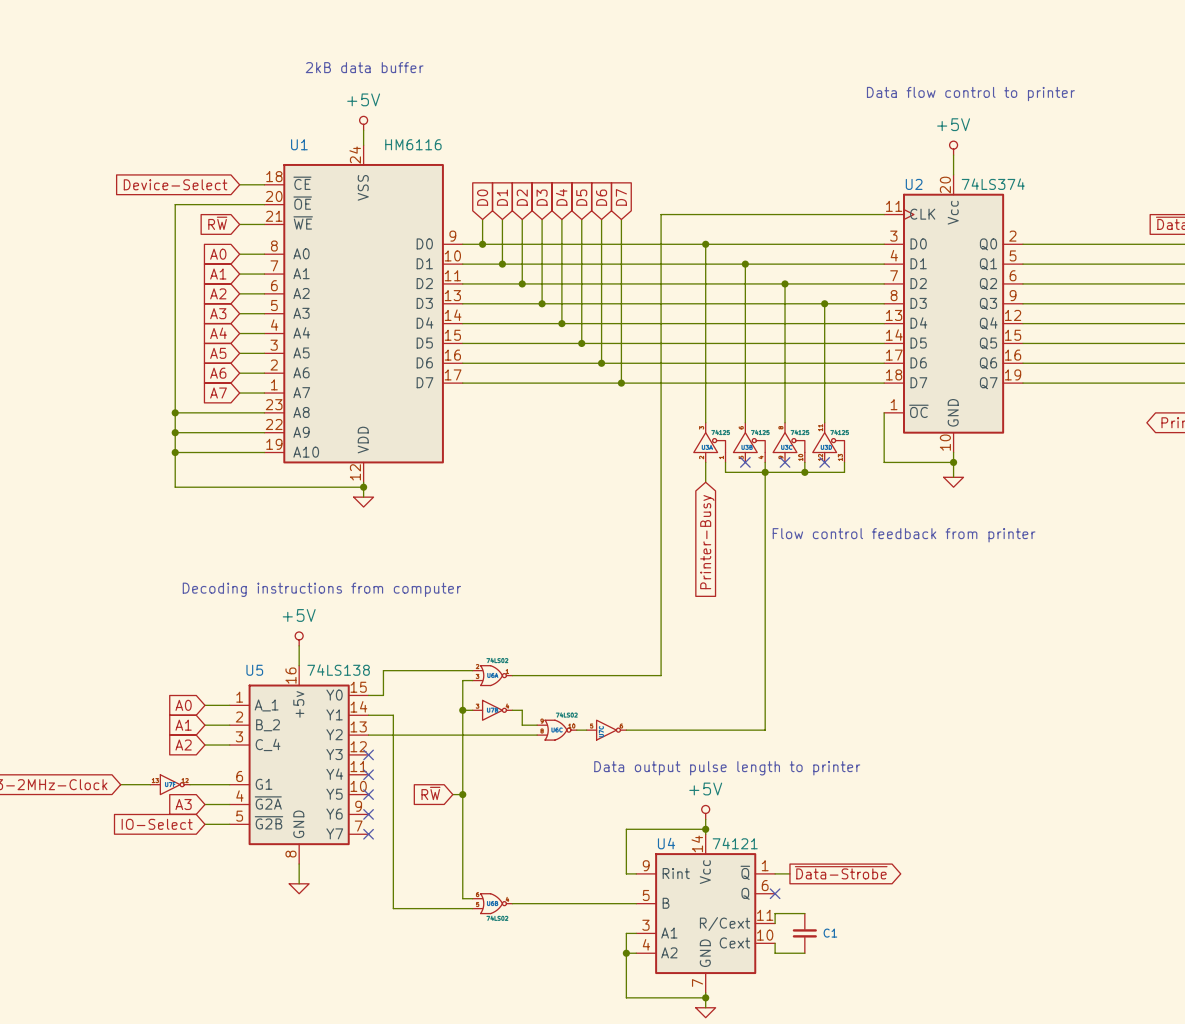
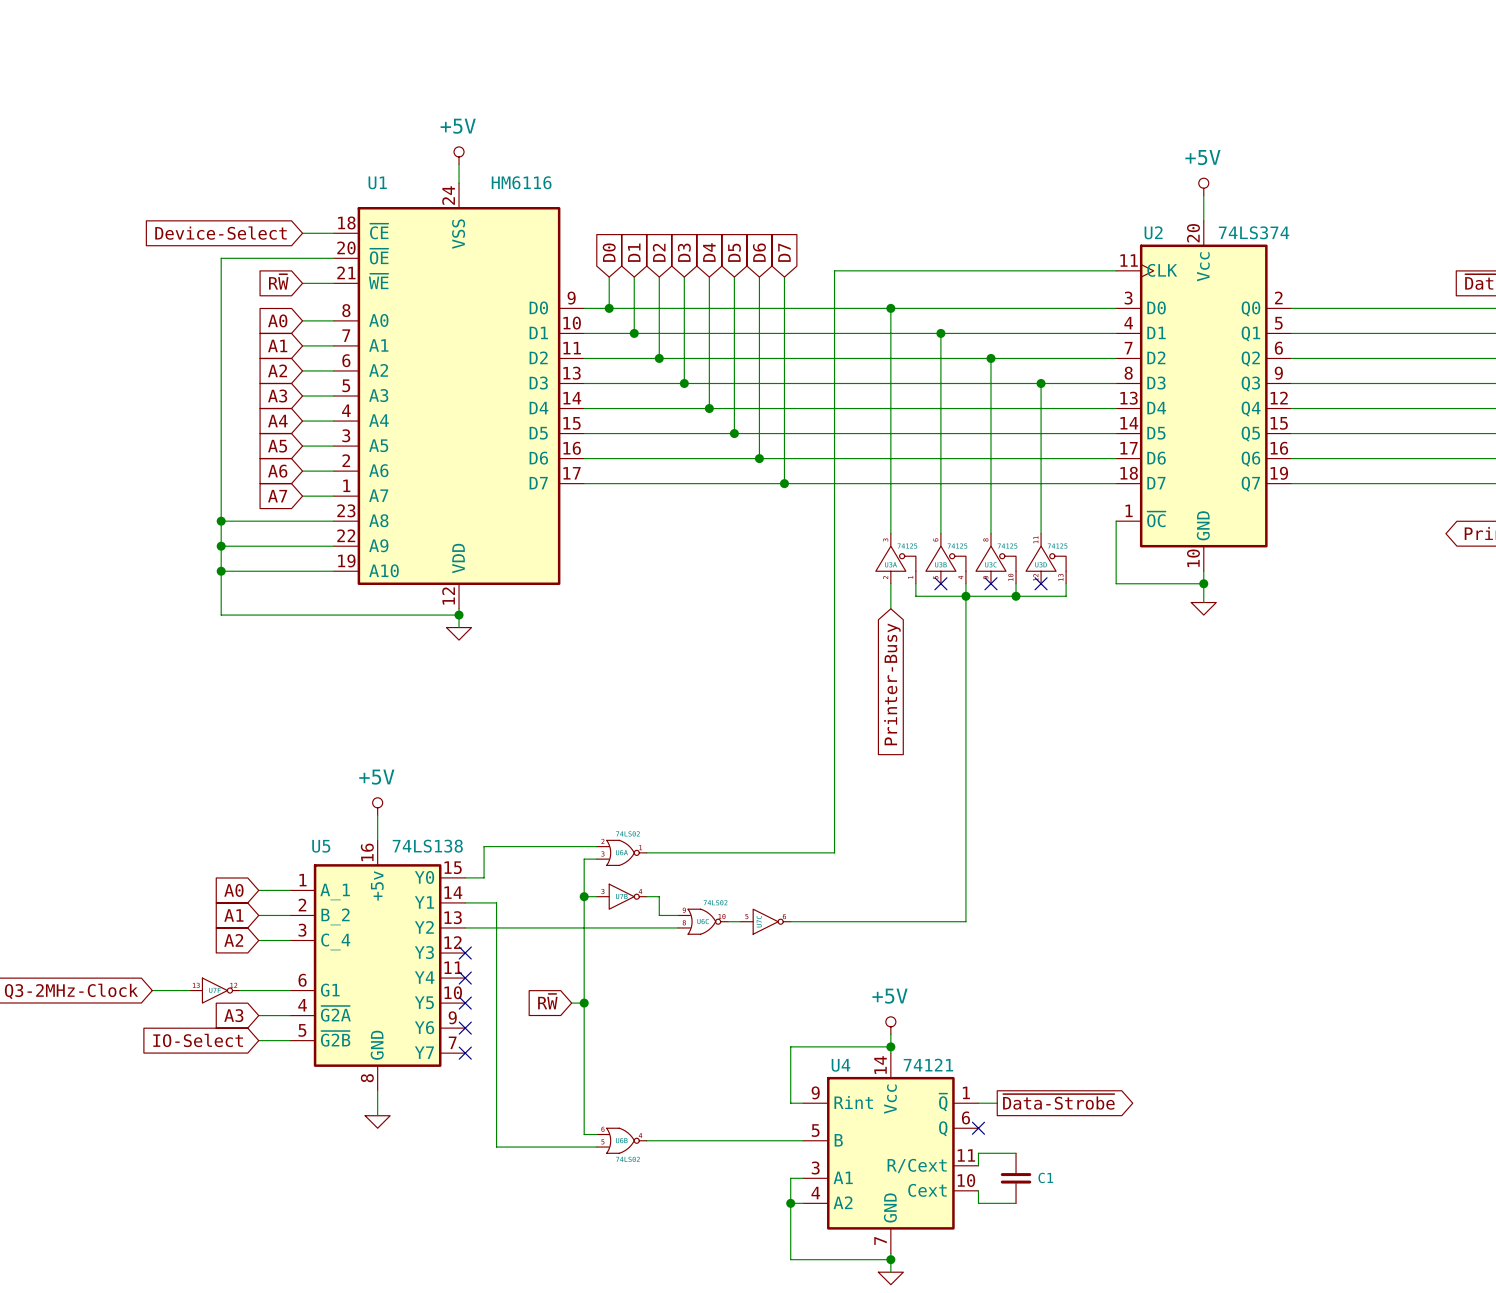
text: 2kB data buffer (364, 67) -> none
text: Data flow control to printer (970, 94) -> none
text: Flow control feedback from printer (904, 535) -> none
text: Decoding instructions from computer (321, 589) -> none
text: Data output pulse length to printer (727, 768) -> none

